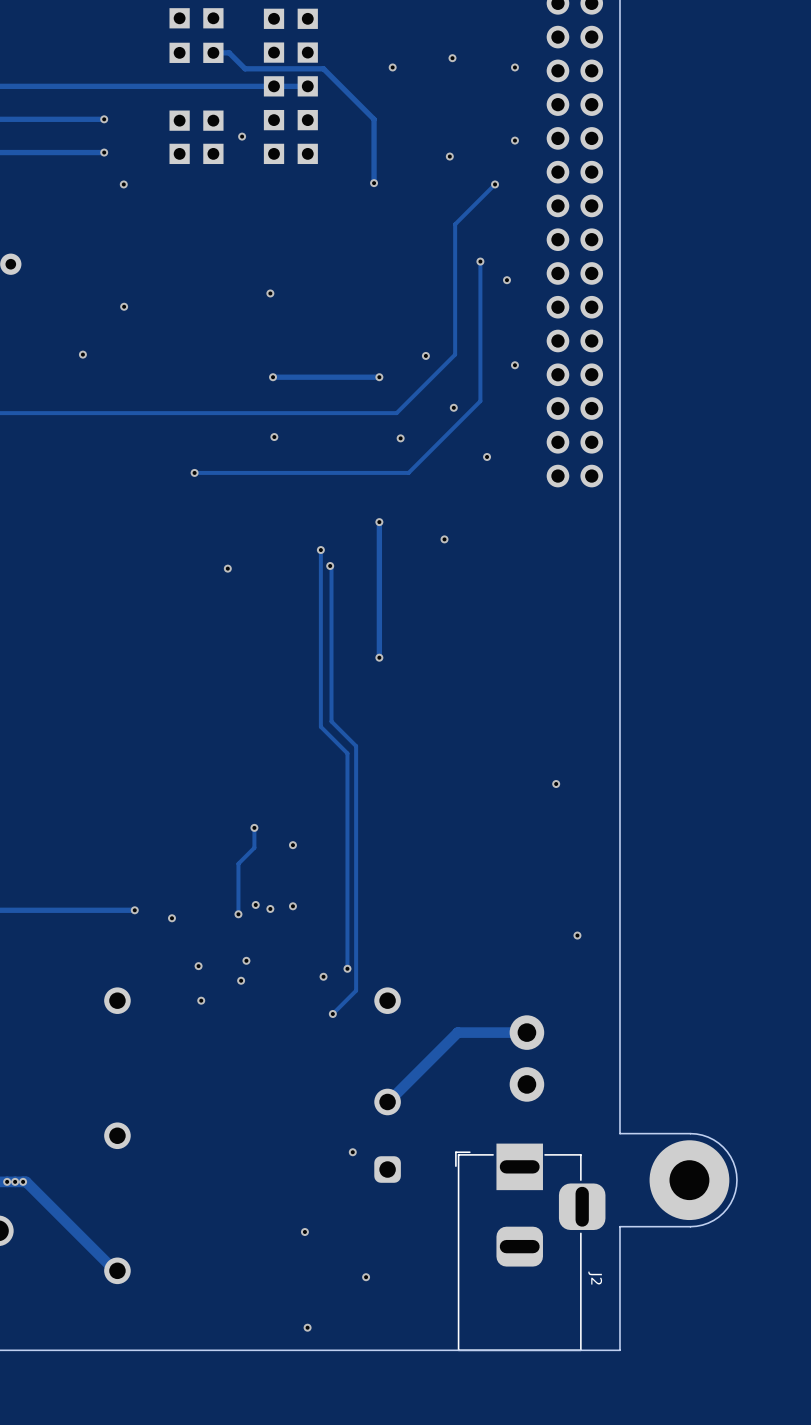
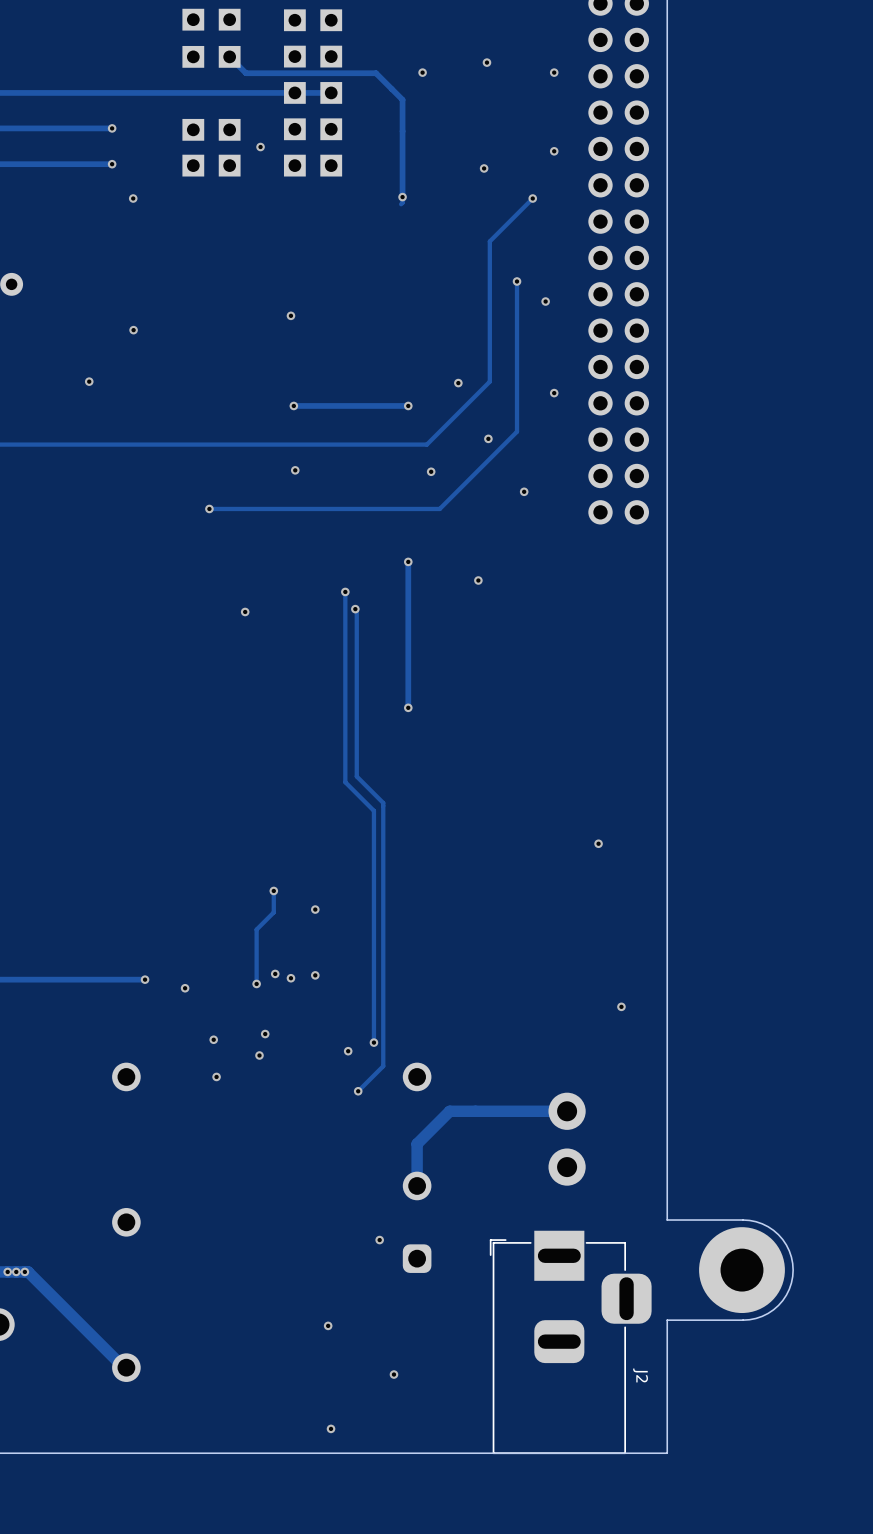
track: (213, 52) (229, 52) (245, 68) (323, 68) (374, 119) -> (229, 56) (246, 73) (375, 73) (402, 99) (402, 128)
track: none -> (402, 197) (401, 204)
track: (457, 1032) (387, 1102) -> (492, 1111) (449, 1111) (417, 1143) (417, 1186)

